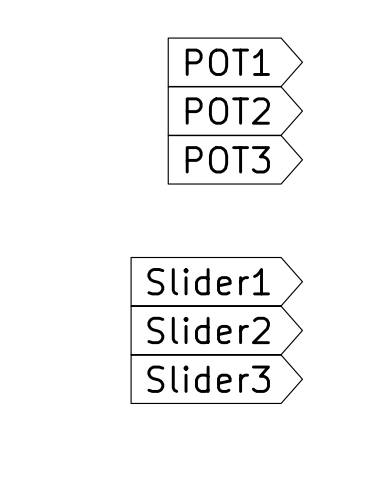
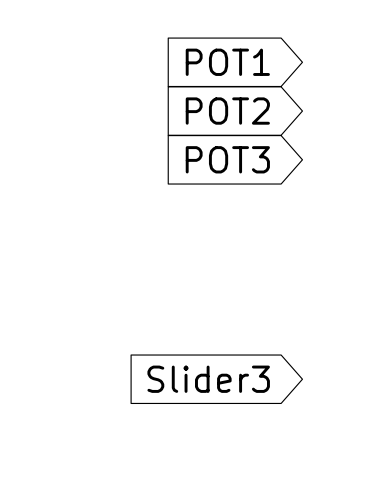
global label: Slider1 (208, 281) -> none
global label: Slider2 (208, 330) -> none

